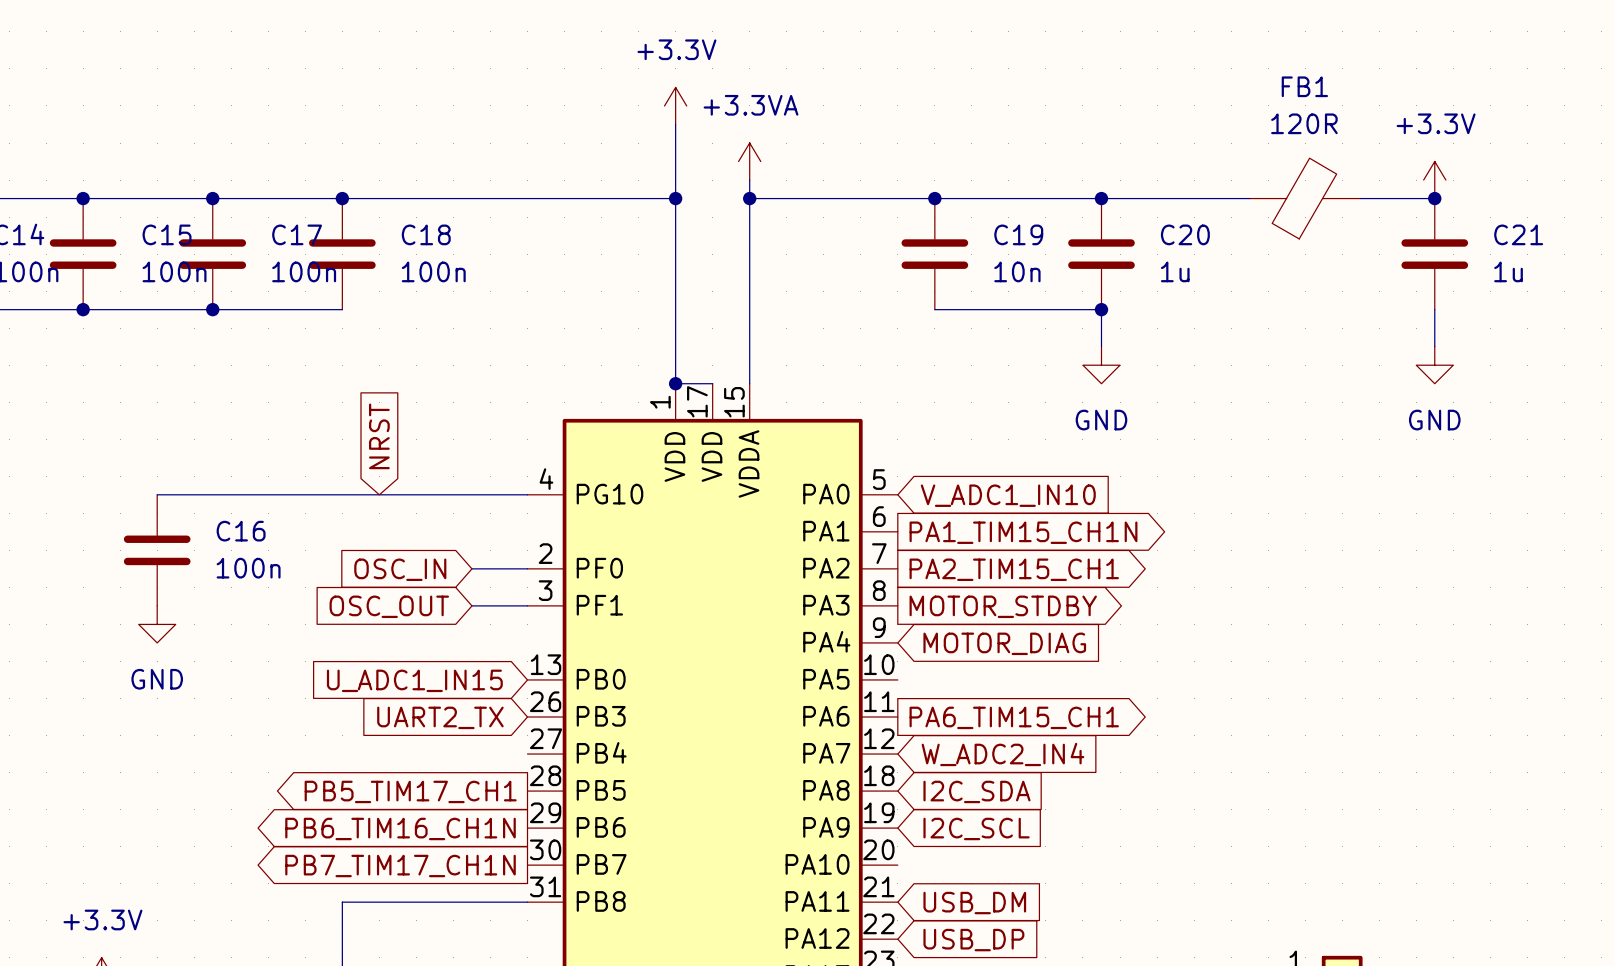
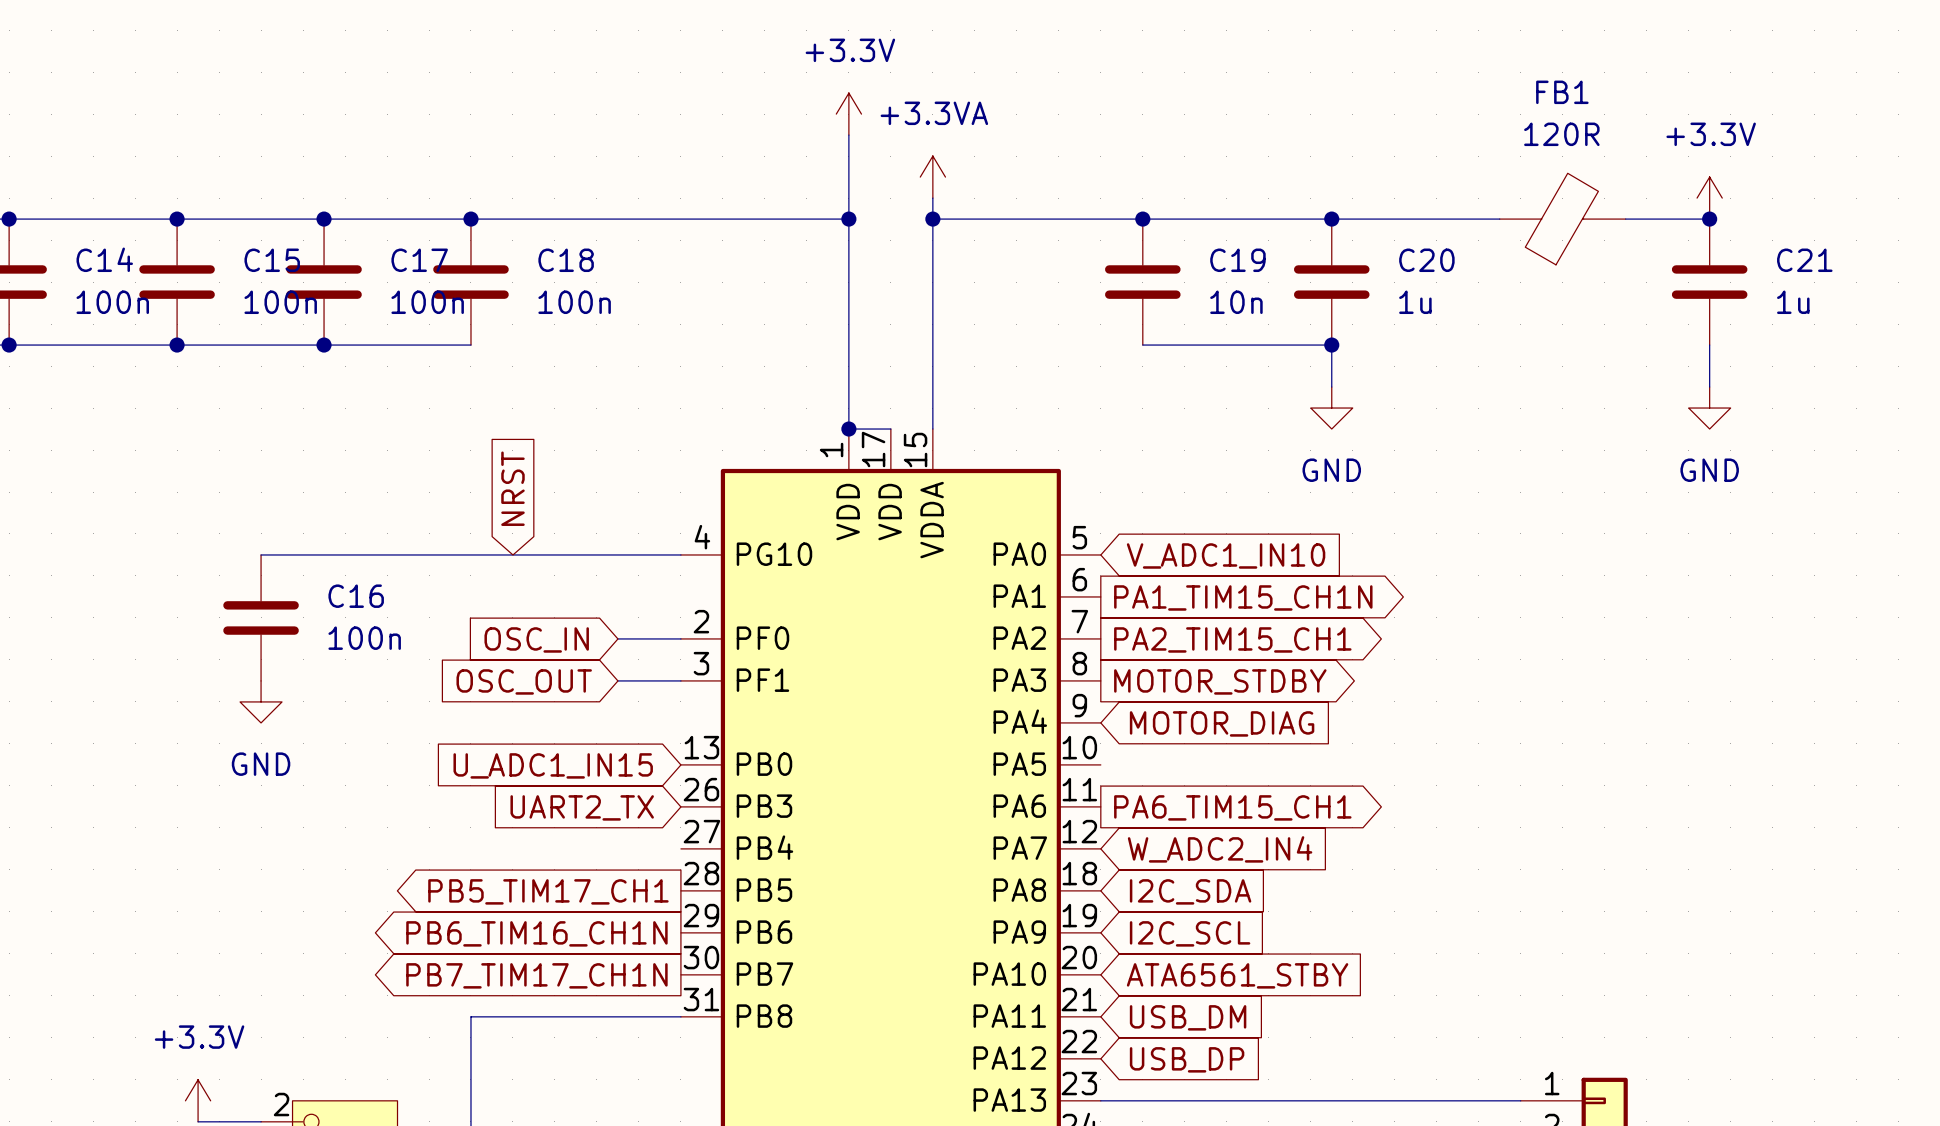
global label: none -> ATA6561_STBY (1237, 975)

